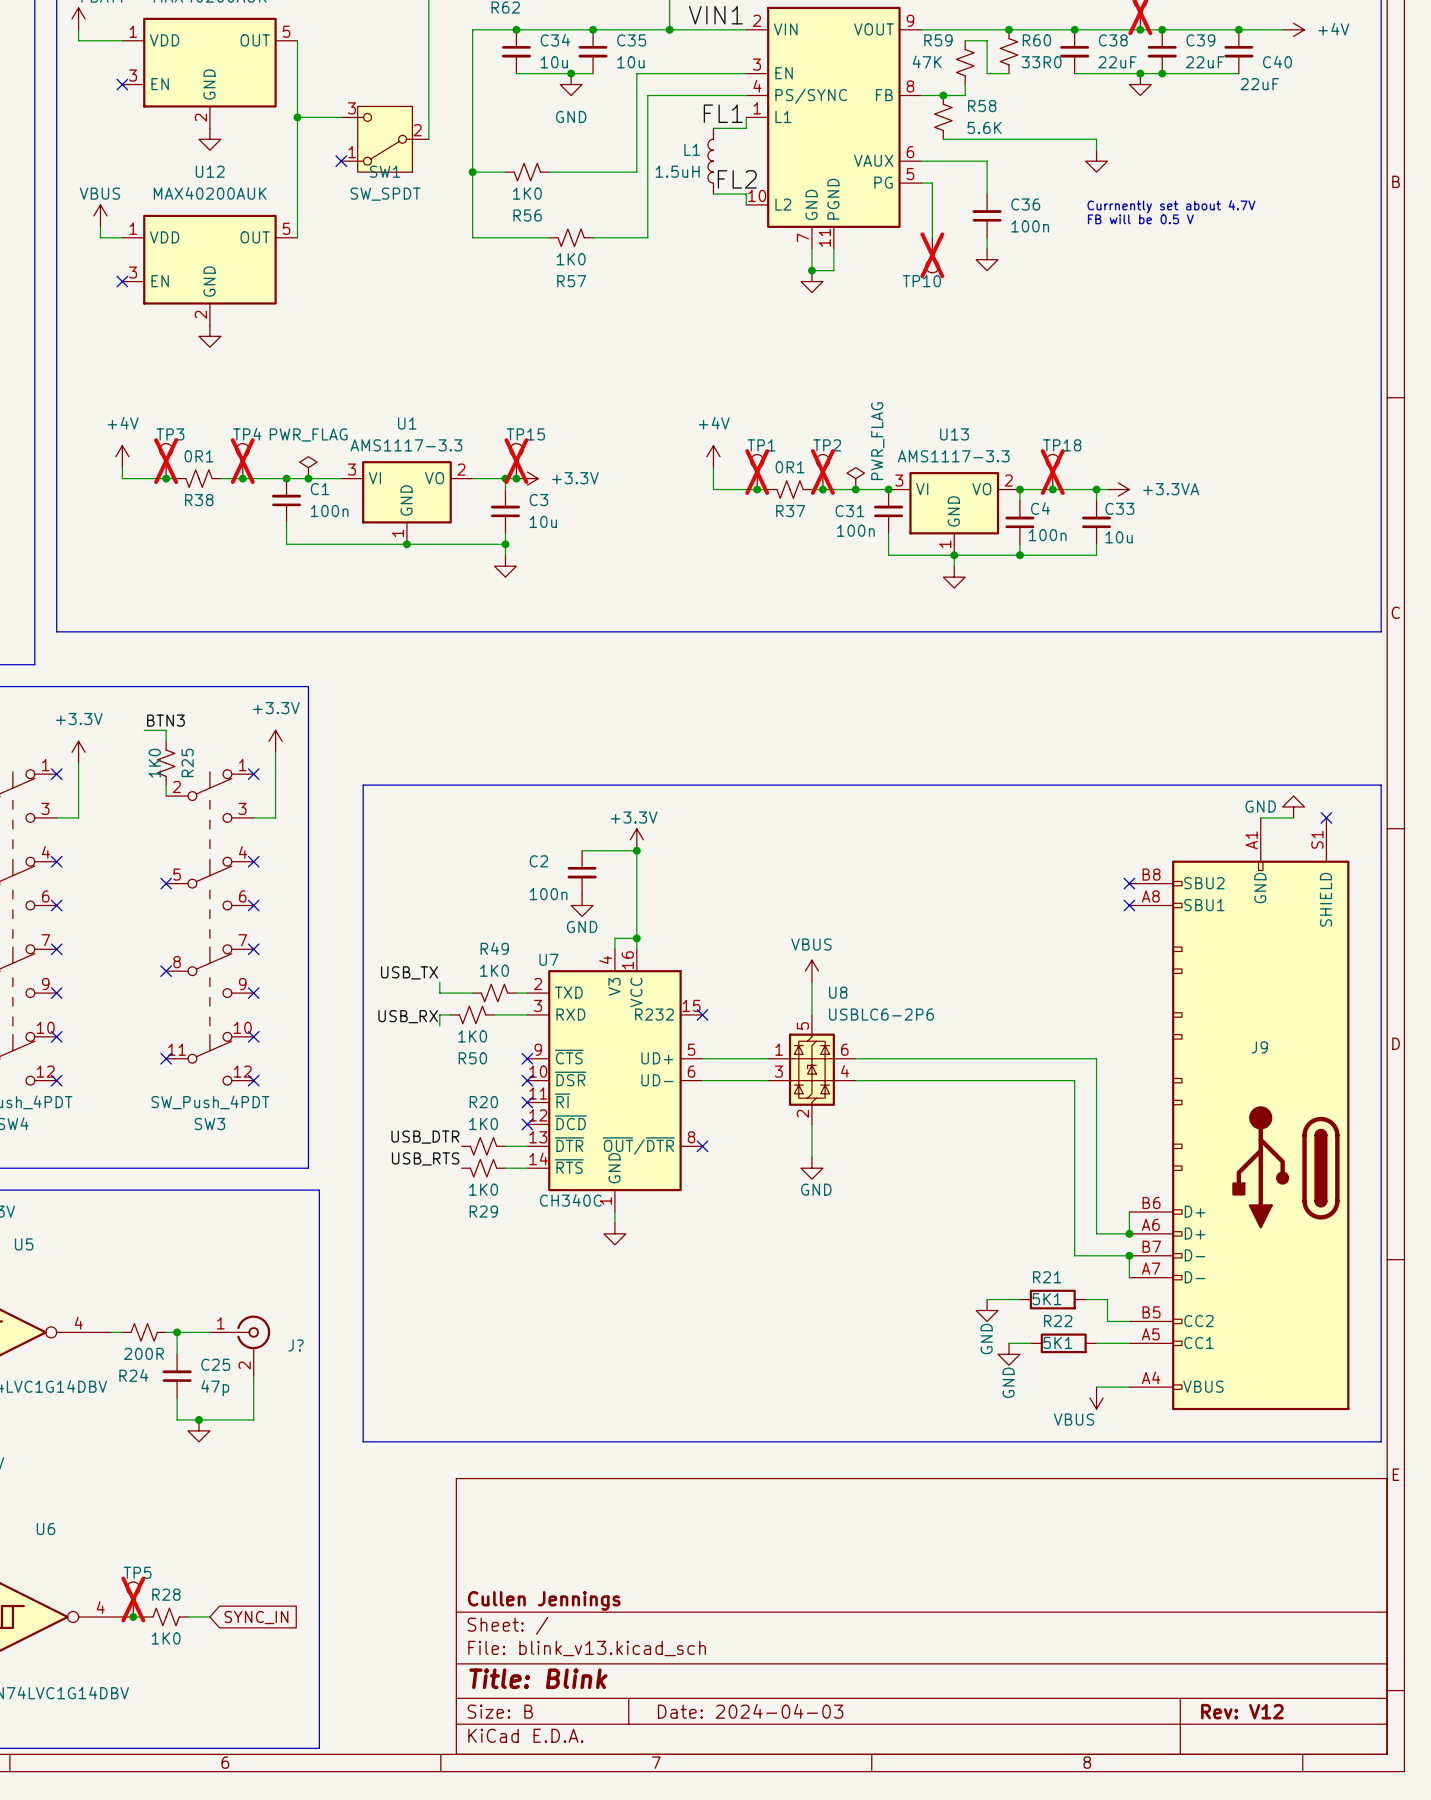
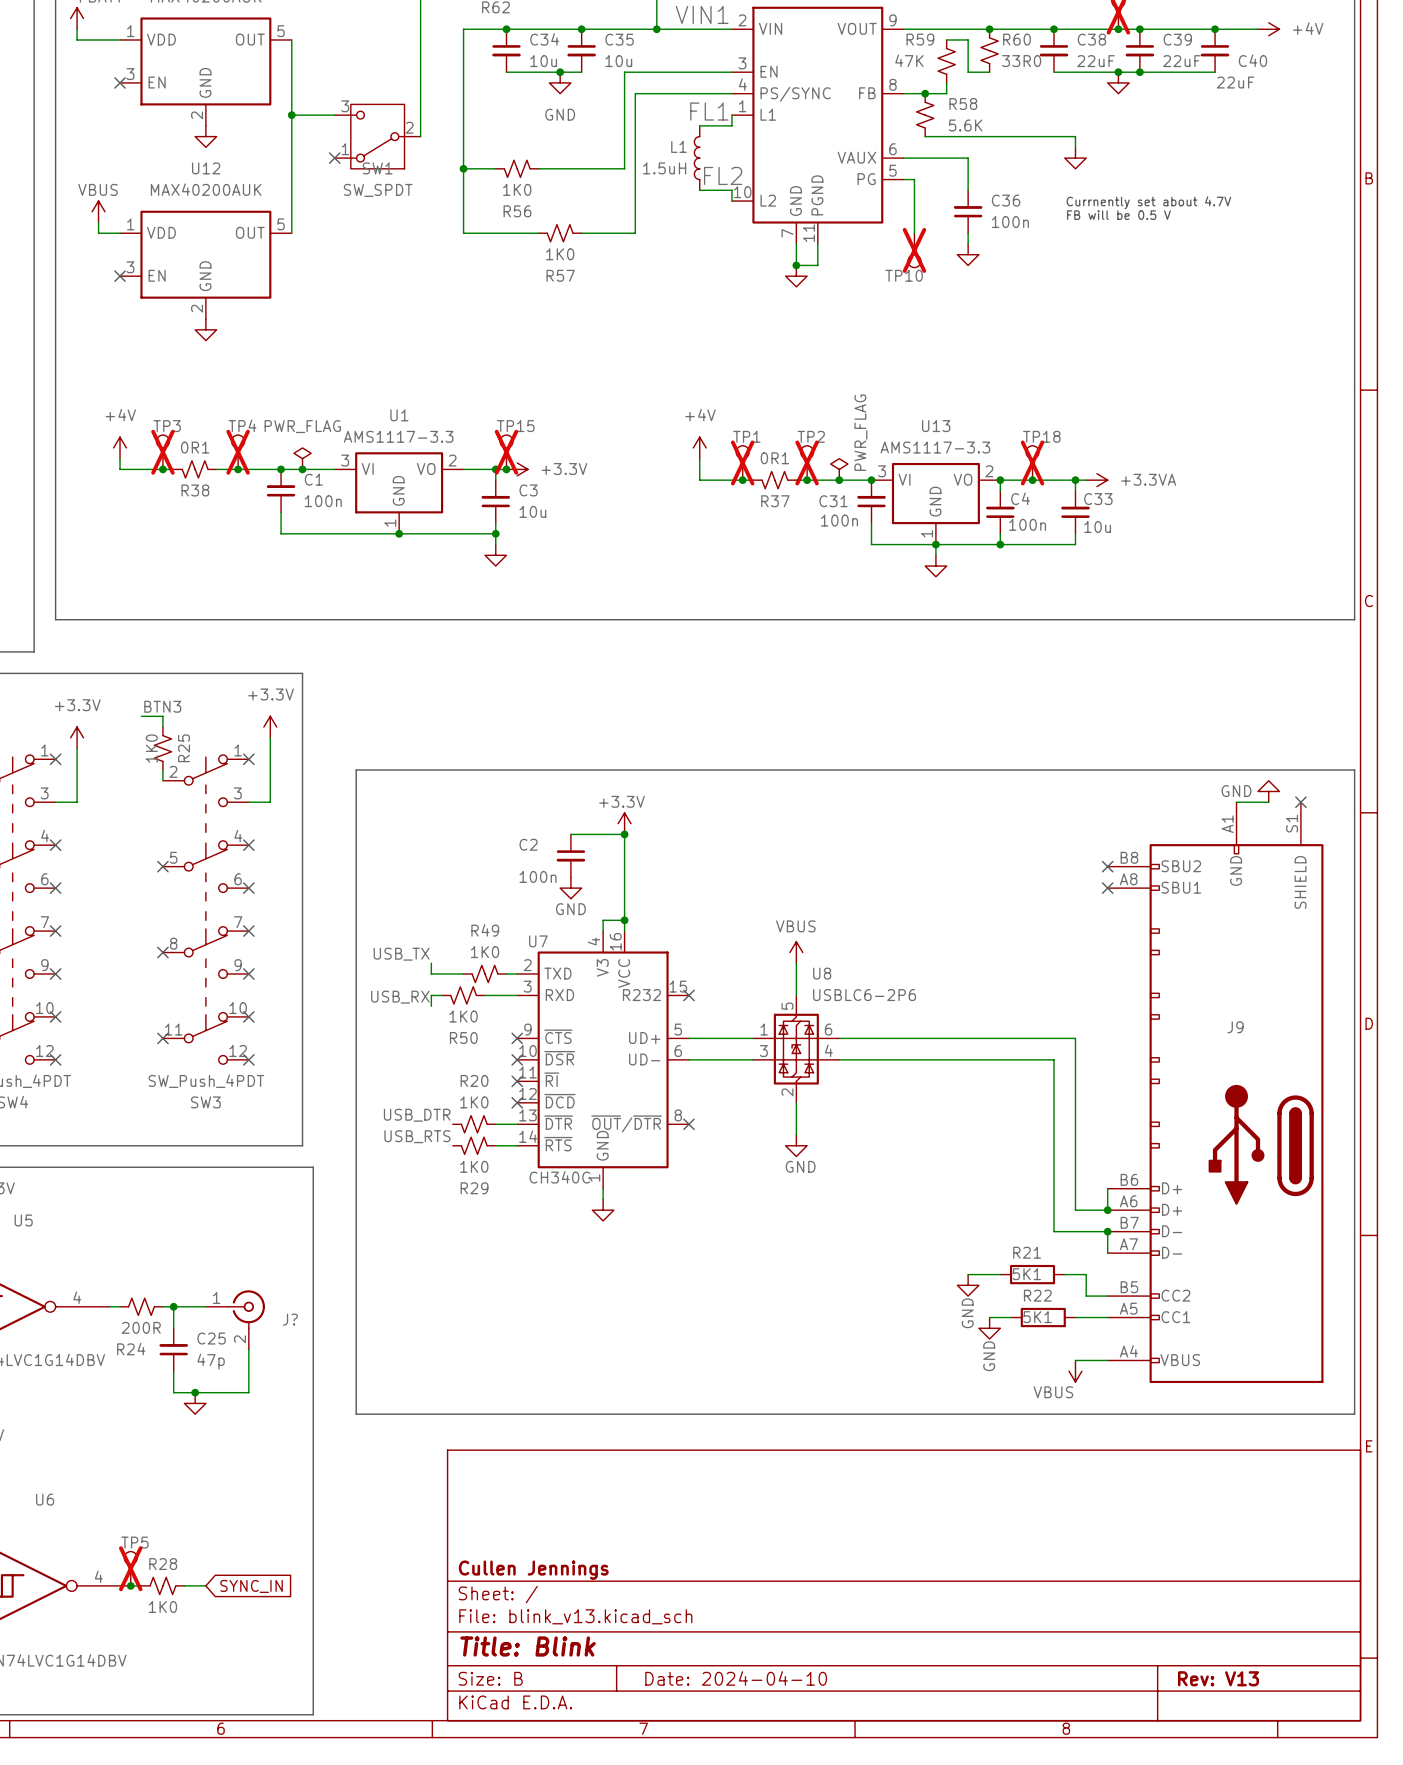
title block: Date: 2024-04-03 (750, 1711) -> Date: 2024-04-10 (736, 1678)
title block: Rev: V12 (1242, 1711) -> Rev: V13 (1218, 1678)

